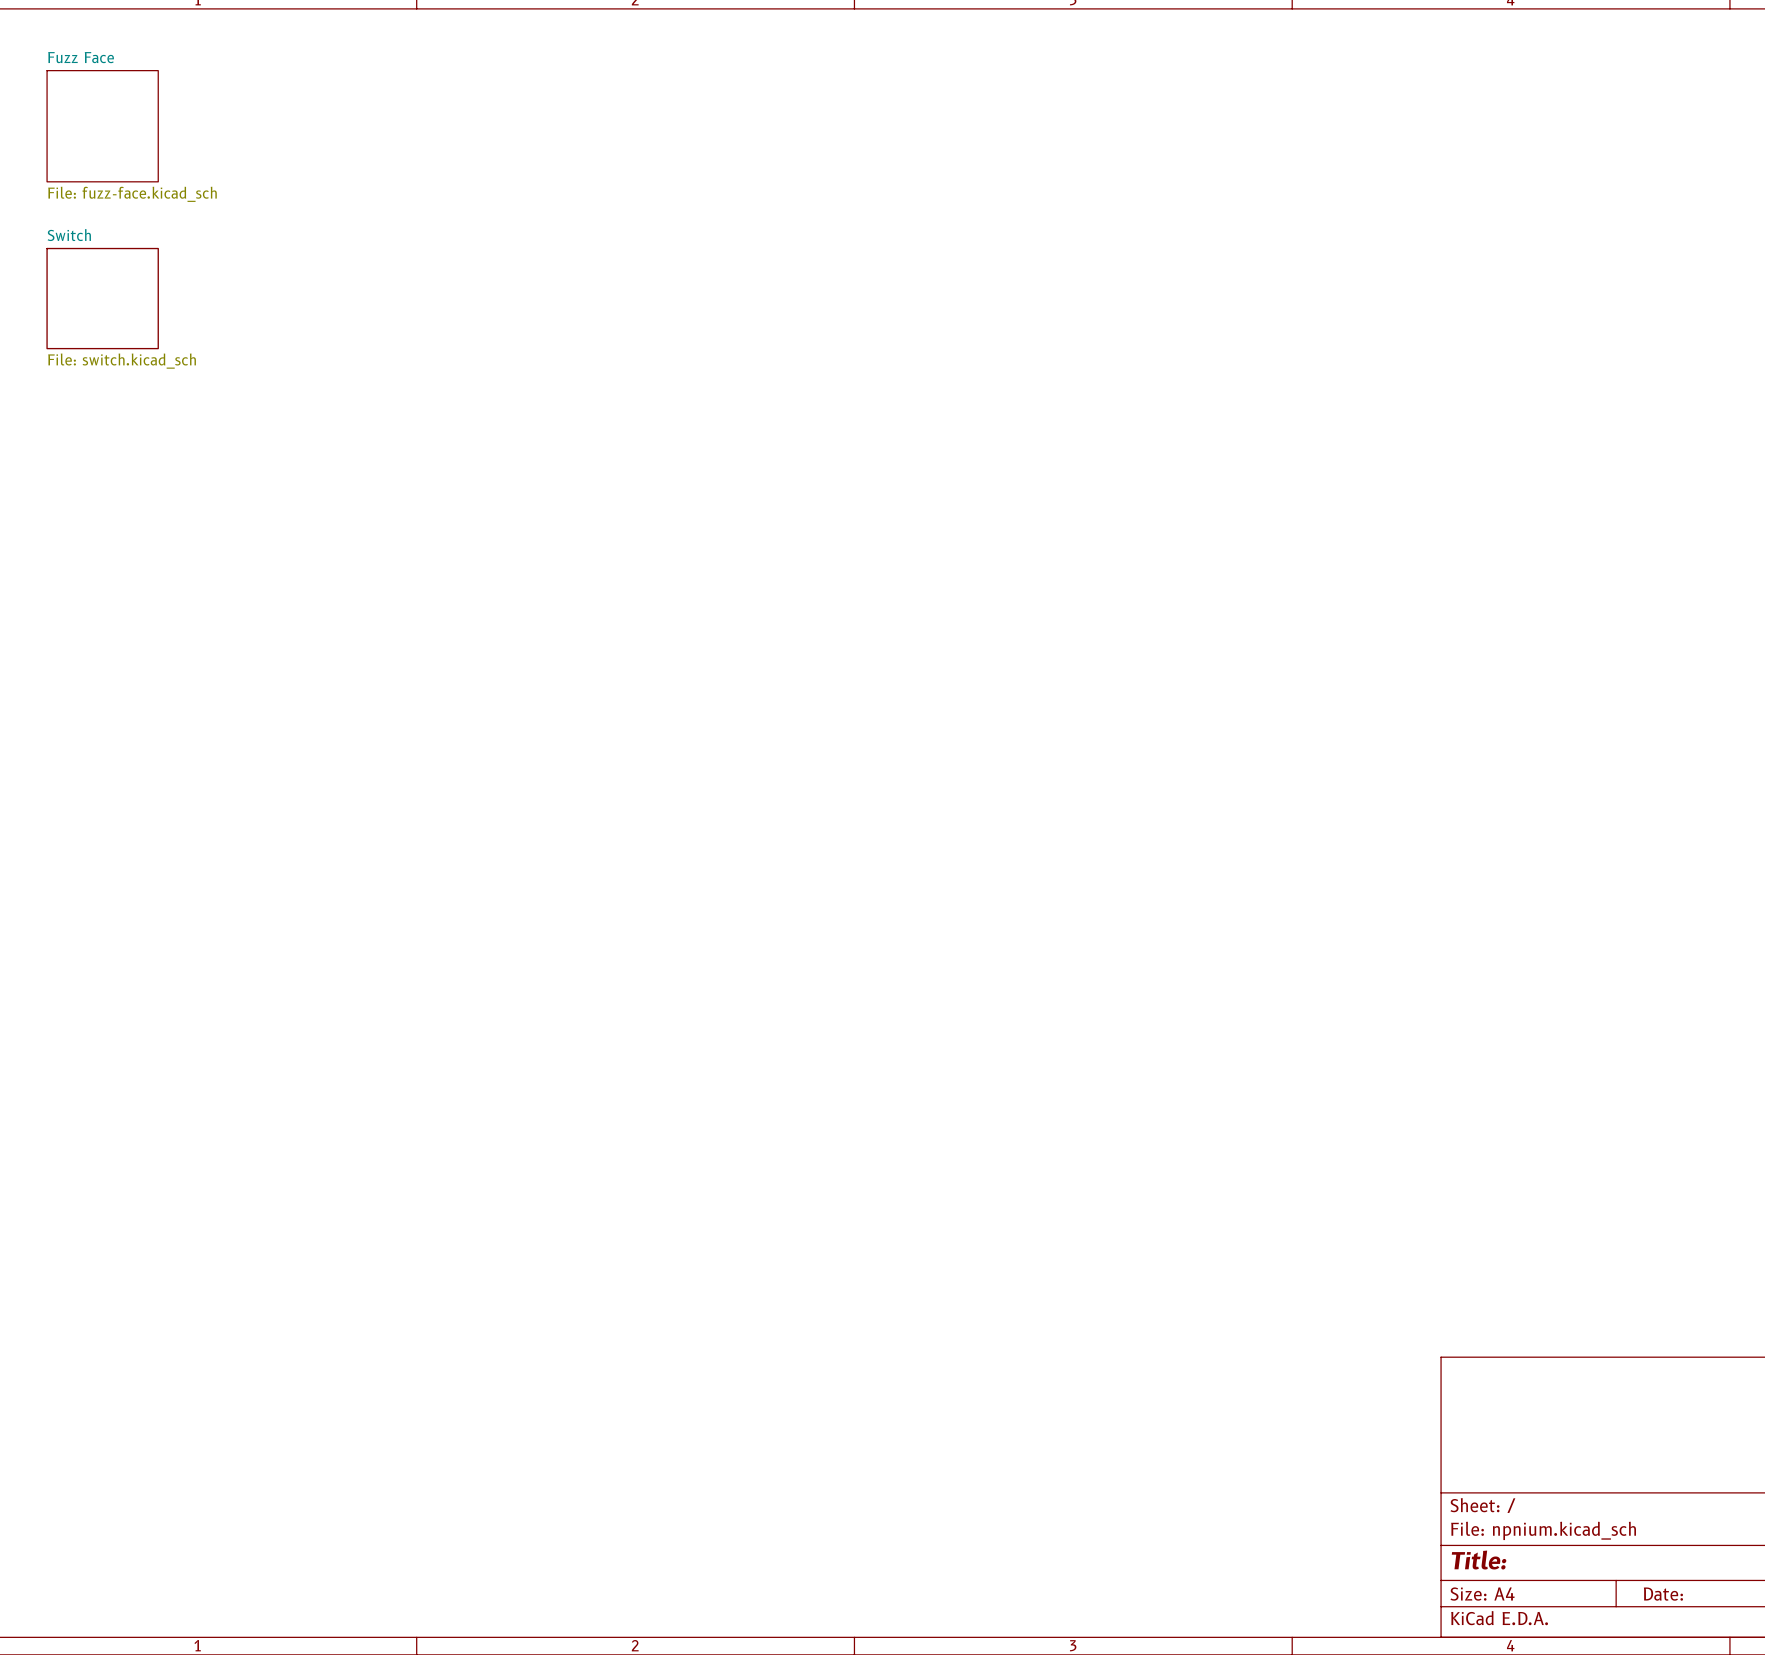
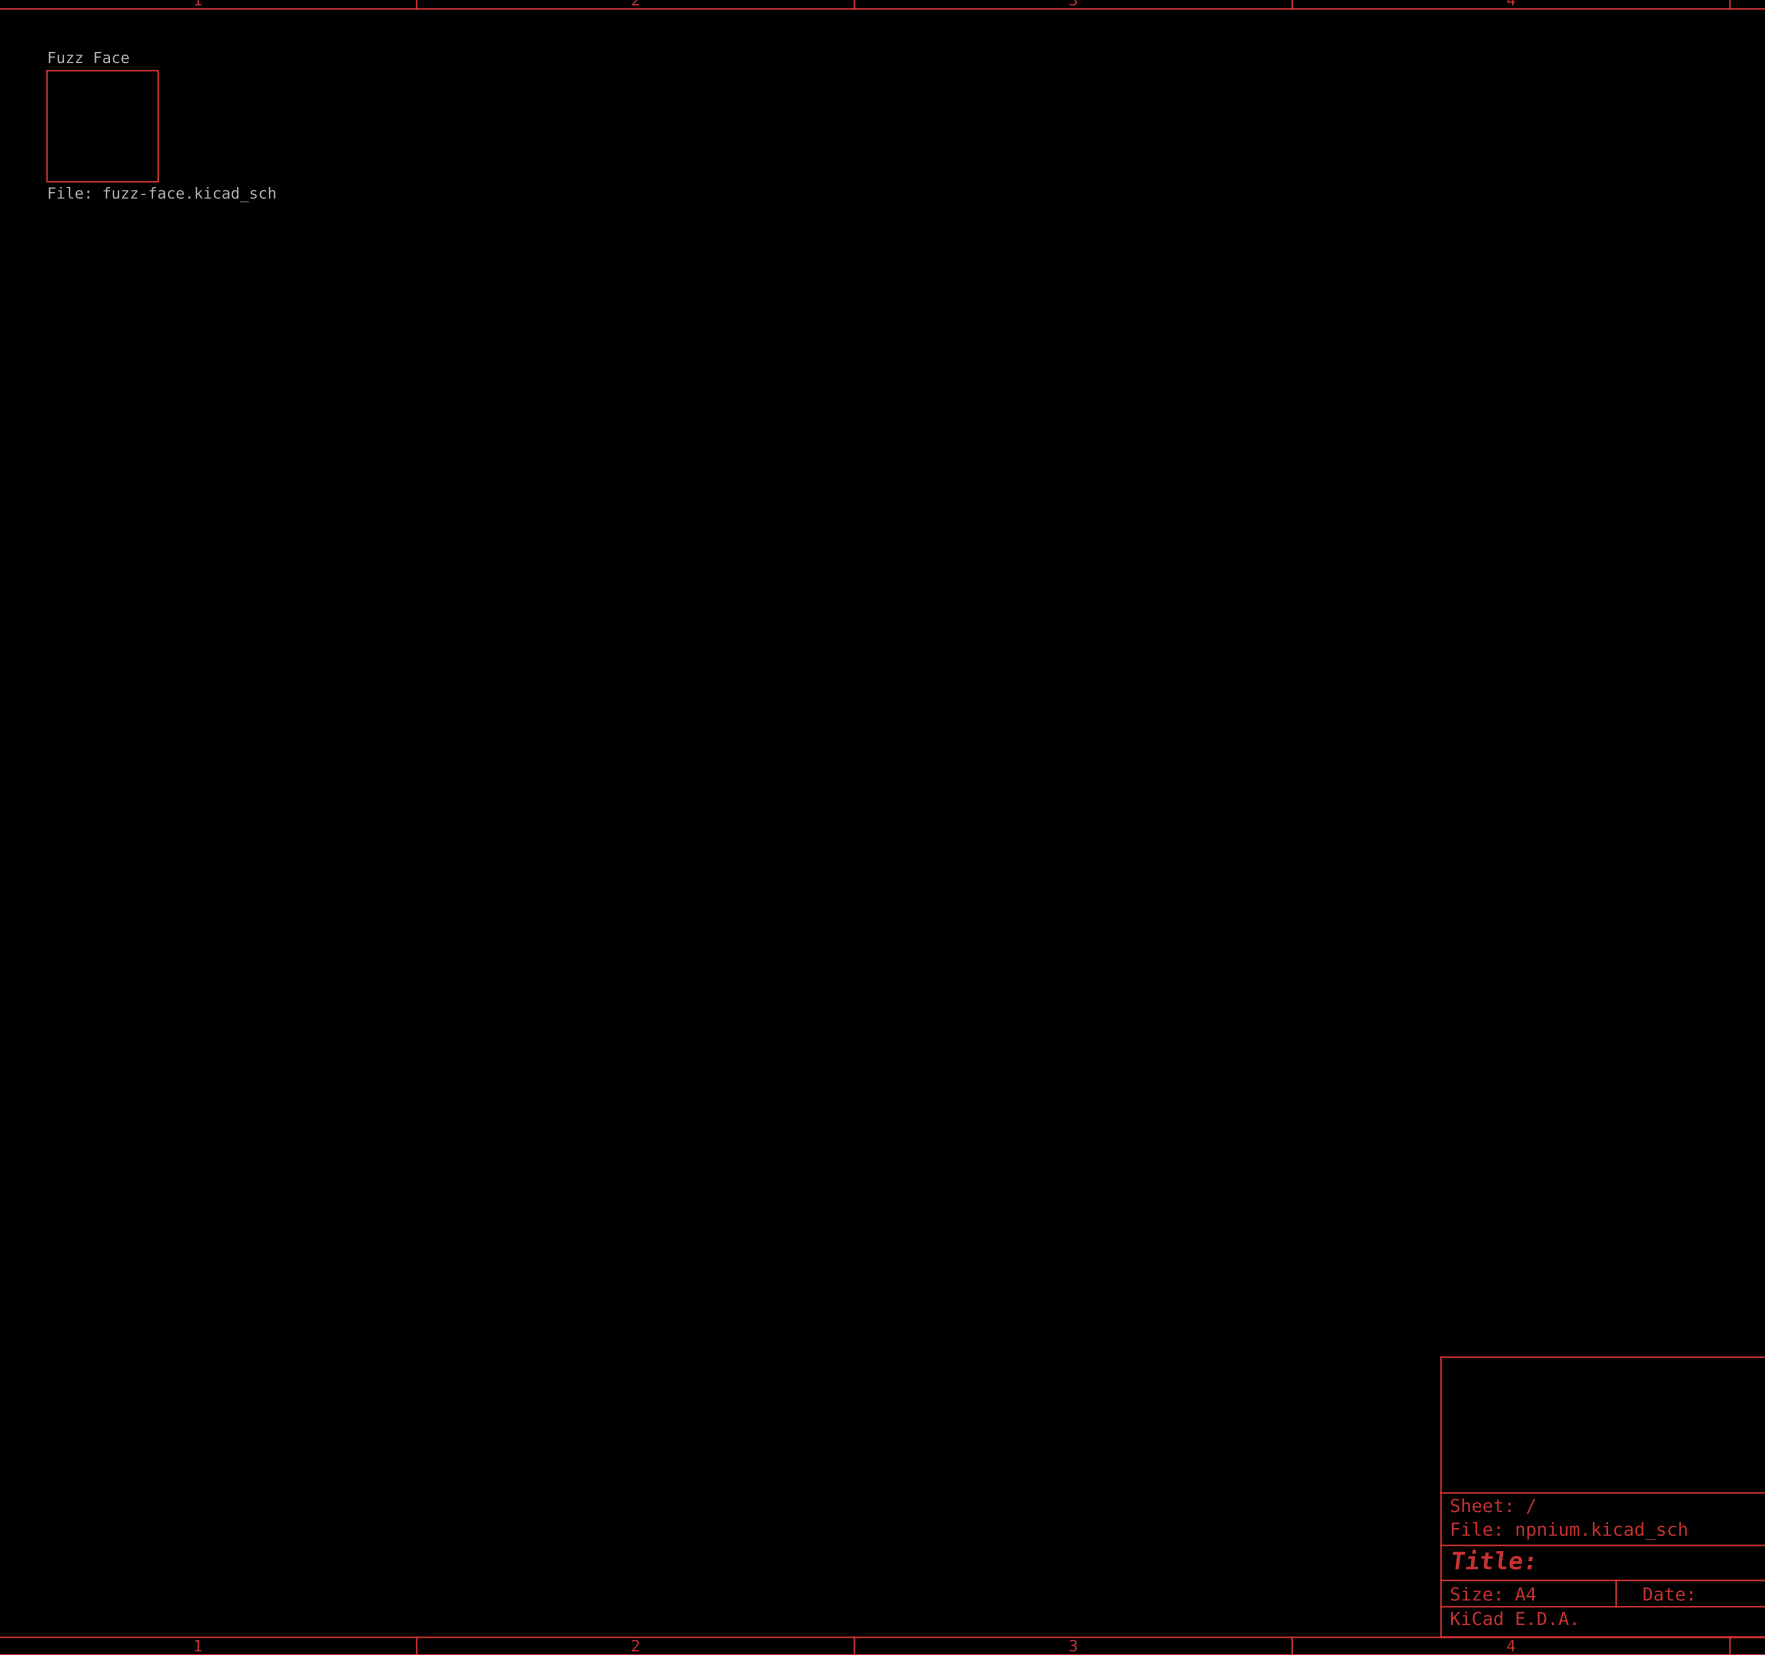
sheet Switch: File: switch.kicad_sch (102, 298) -> none

